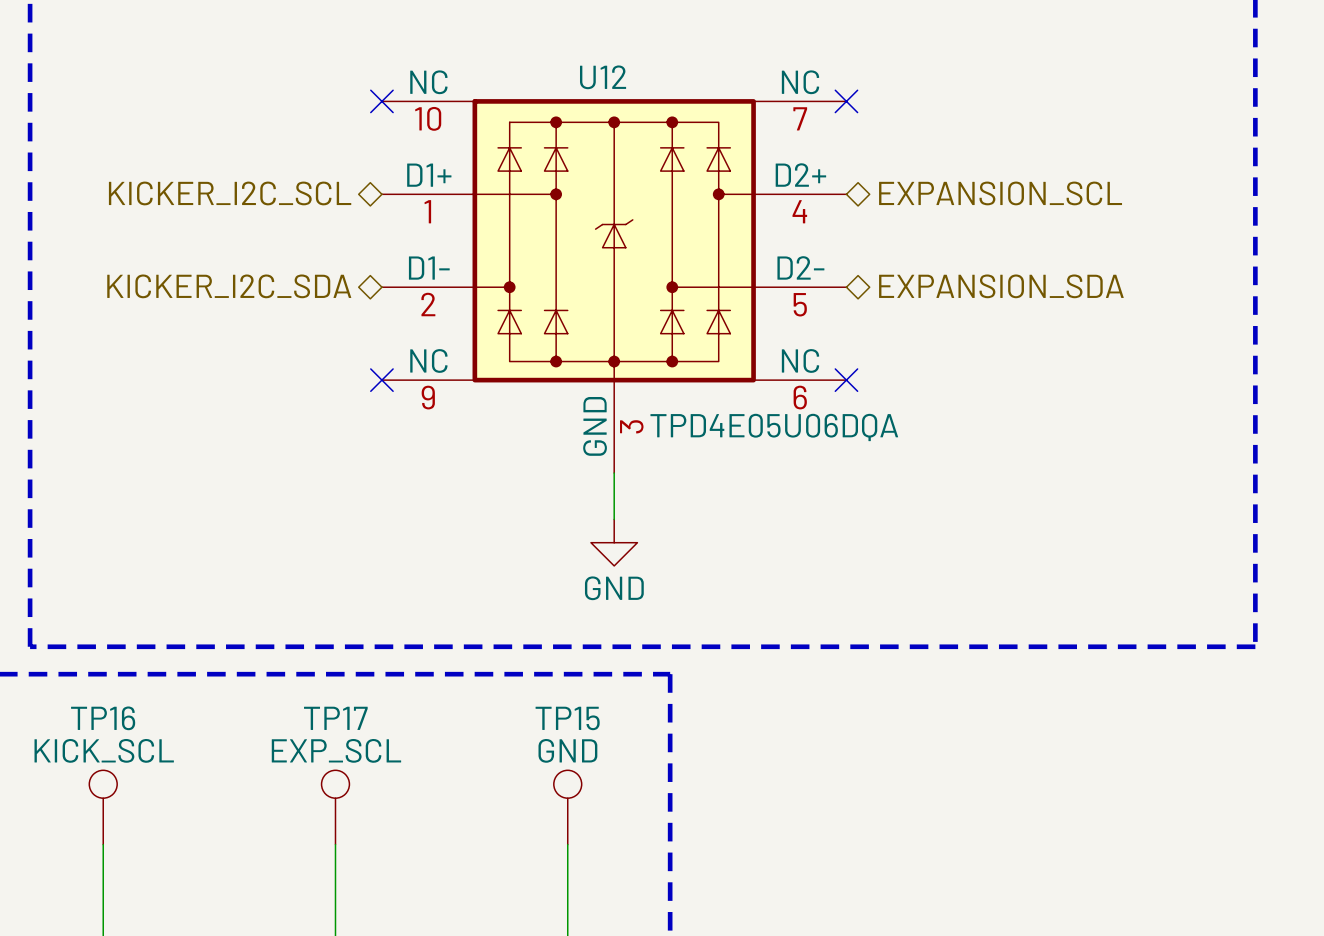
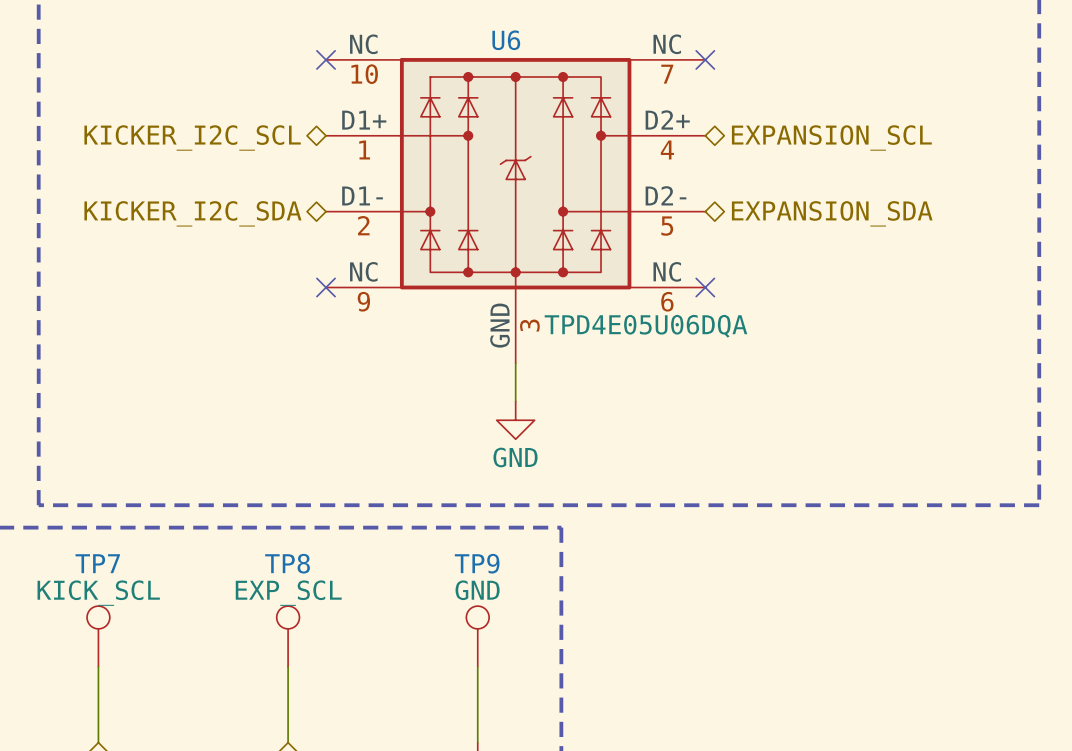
U12 name: U12 (603, 77) -> U6 (506, 40)
TP16 name: TP16 (103, 718) -> TP7 (97, 563)
TP17 name: TP17 (335, 718) -> TP8 (287, 563)
TP15 name: TP15 (567, 718) -> TP9 (477, 563)

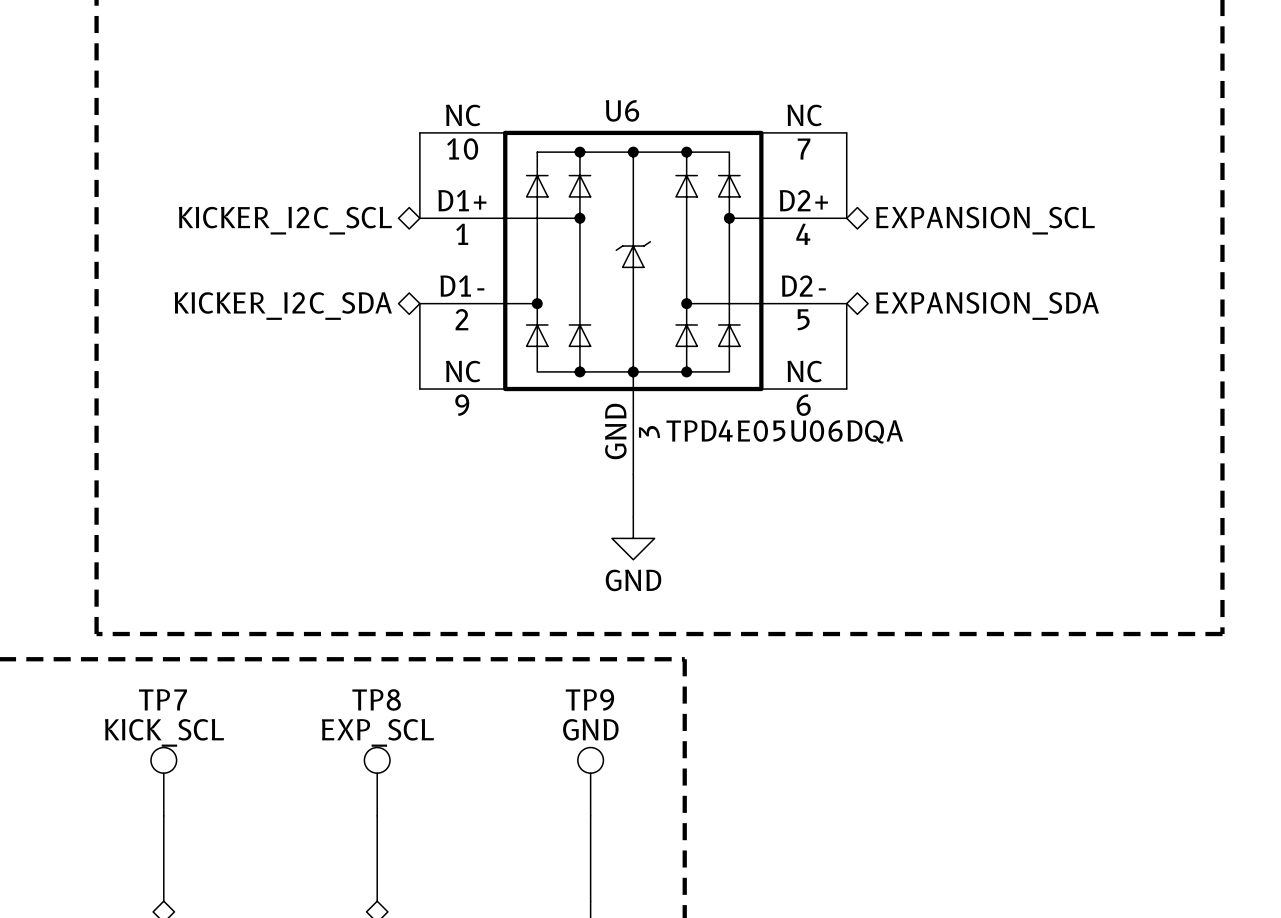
wire: none -> (419, 132) (419, 218)
no-connect mark: (326, 59) -> none
wire: none -> (846, 132) (846, 218)
no-connect mark: (705, 59) -> none
wire: none -> (419, 303) (419, 389)
wire: none -> (846, 303) (846, 389)
no-connect mark: (326, 287) -> none
no-connect mark: (705, 287) -> none

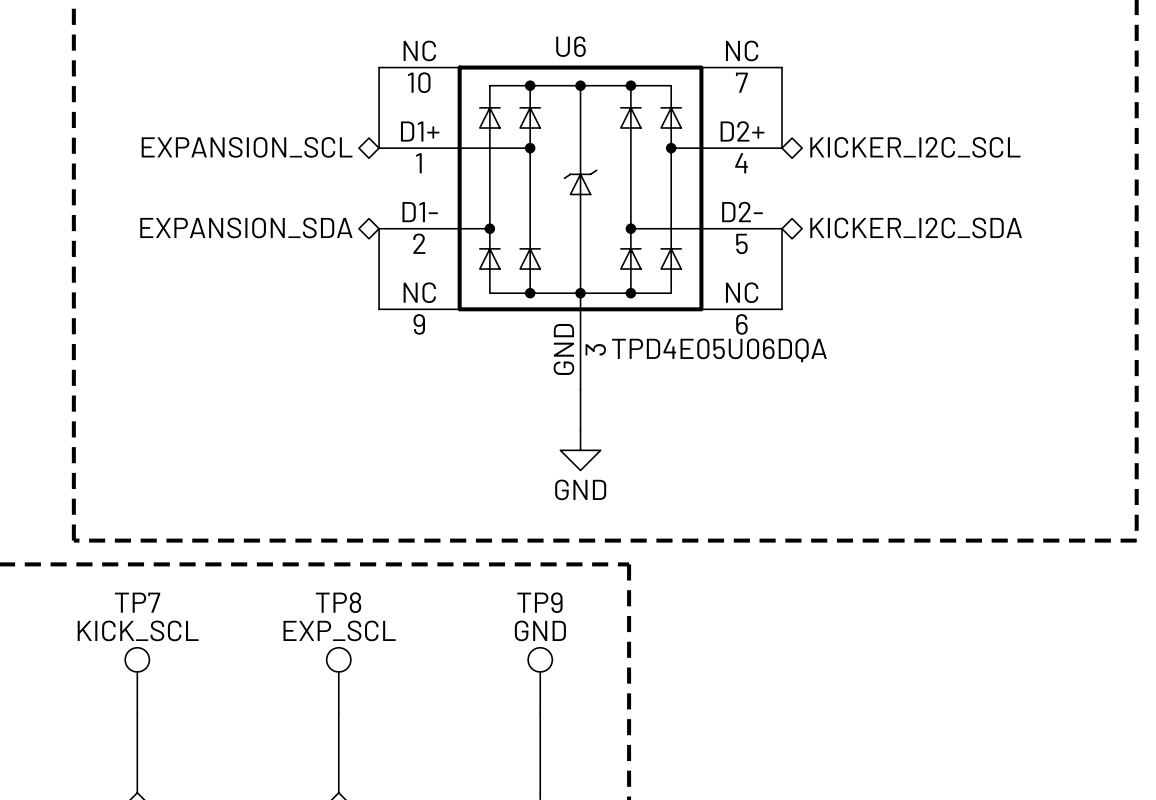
hierarchical label: KICKER_I2C_SCL (285, 220) -> EXPANSION_SCL (247, 147)
hierarchical label: EXPANSION_SCL (985, 220) -> KICKER_I2C_SCL (915, 147)
hierarchical label: KICKER_I2C_SDA (283, 306) -> EXPANSION_SDA (246, 227)
hierarchical label: EXPANSION_SDA (987, 306) -> KICKER_I2C_SDA (916, 227)

